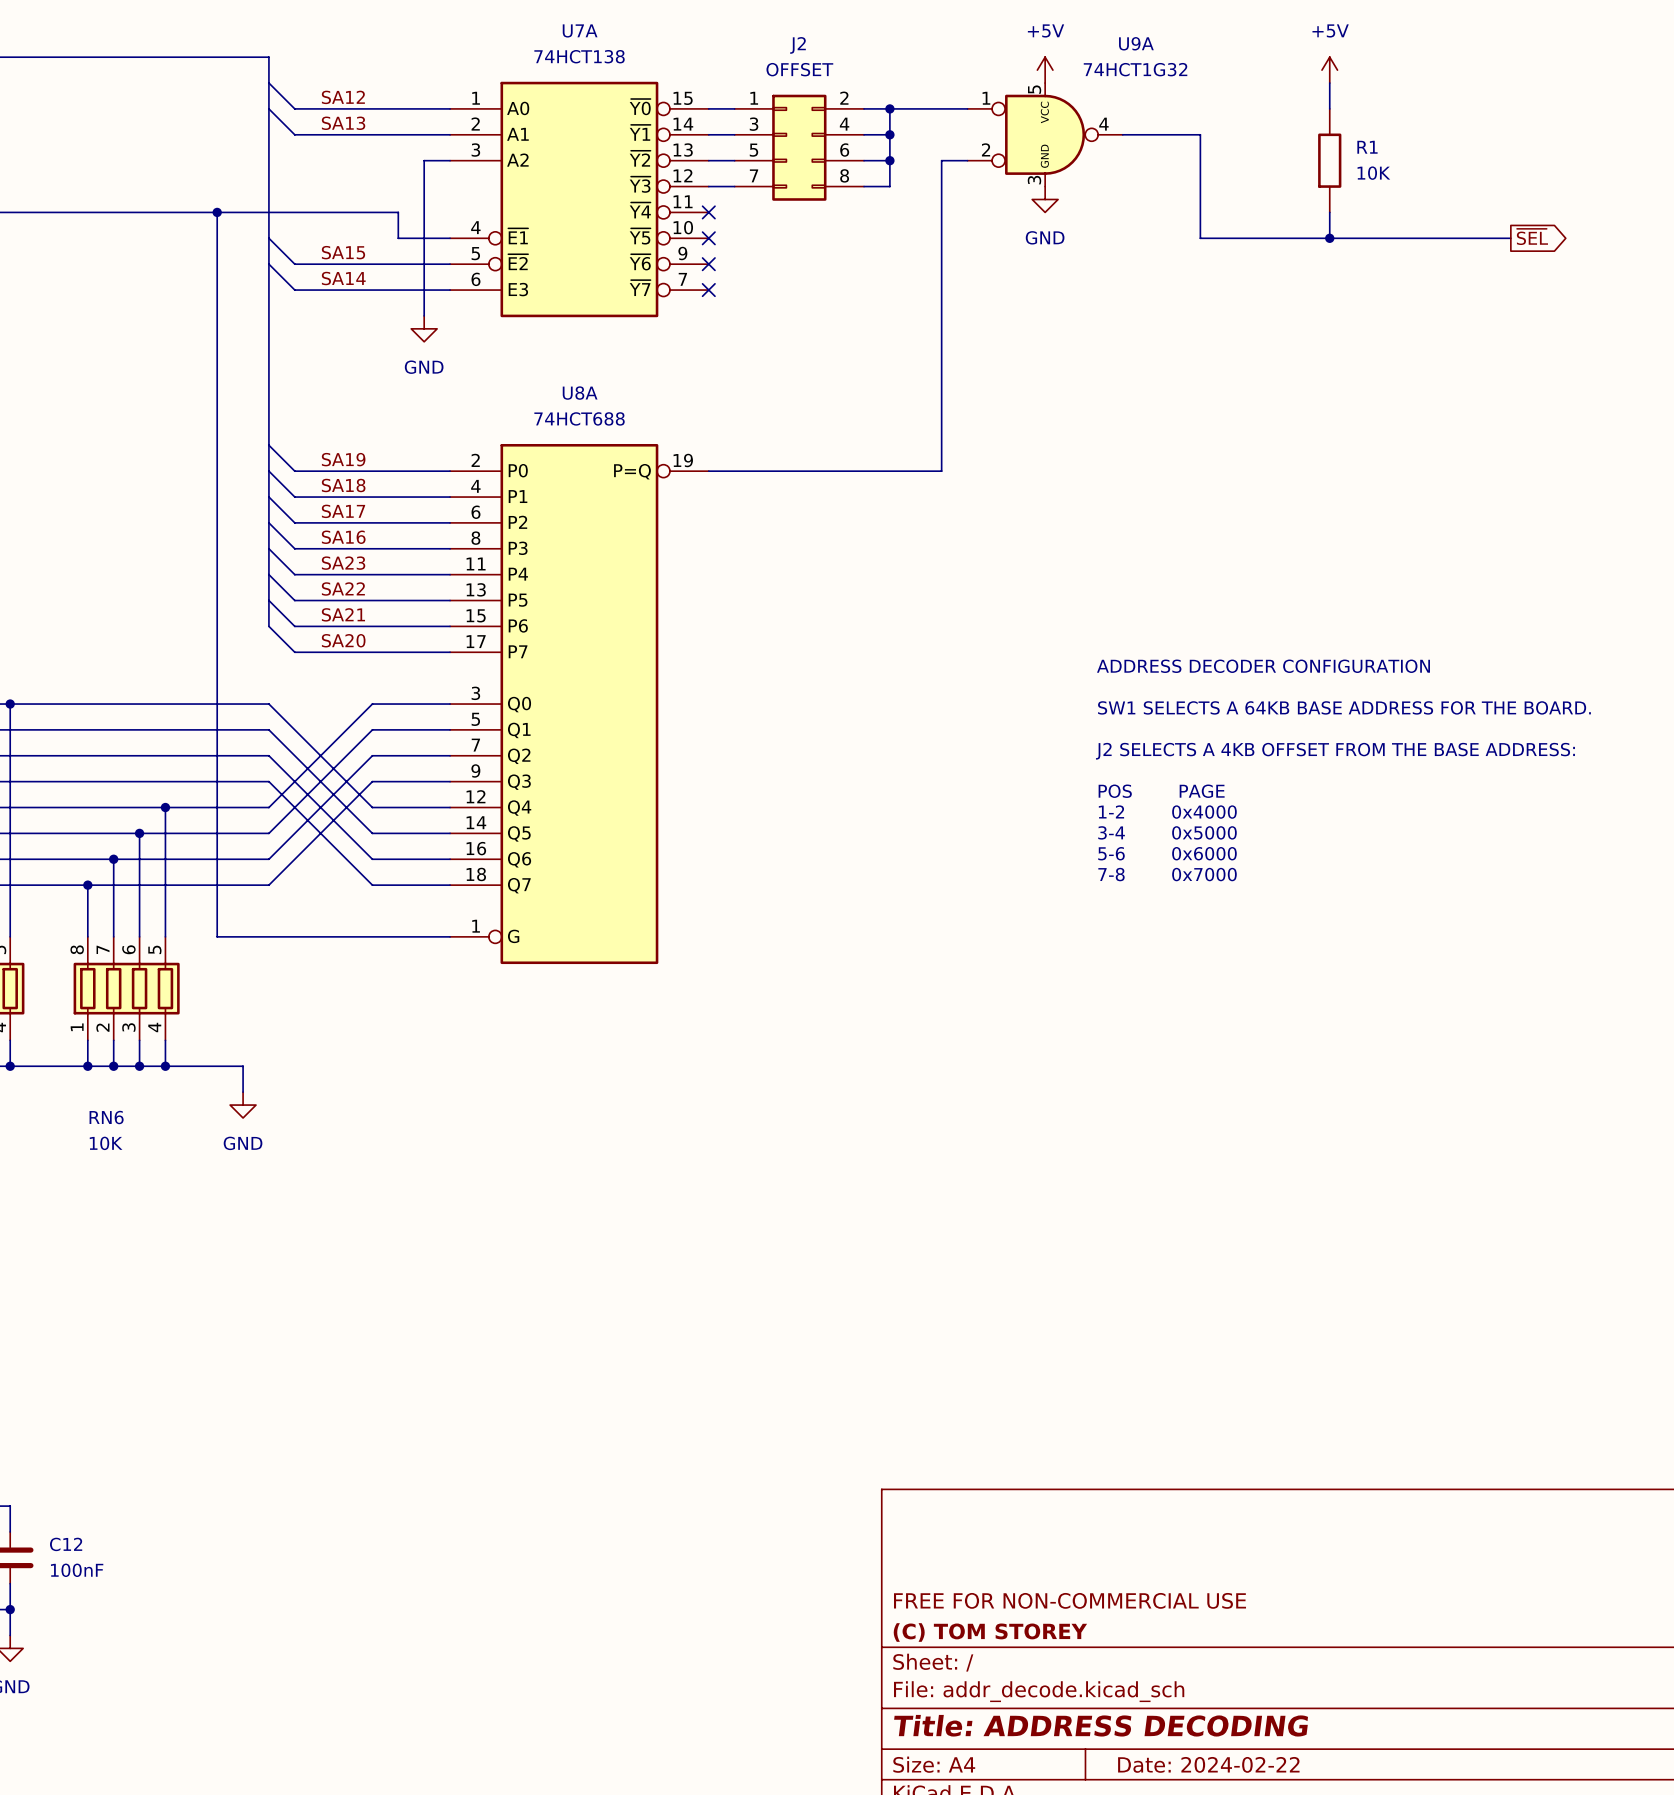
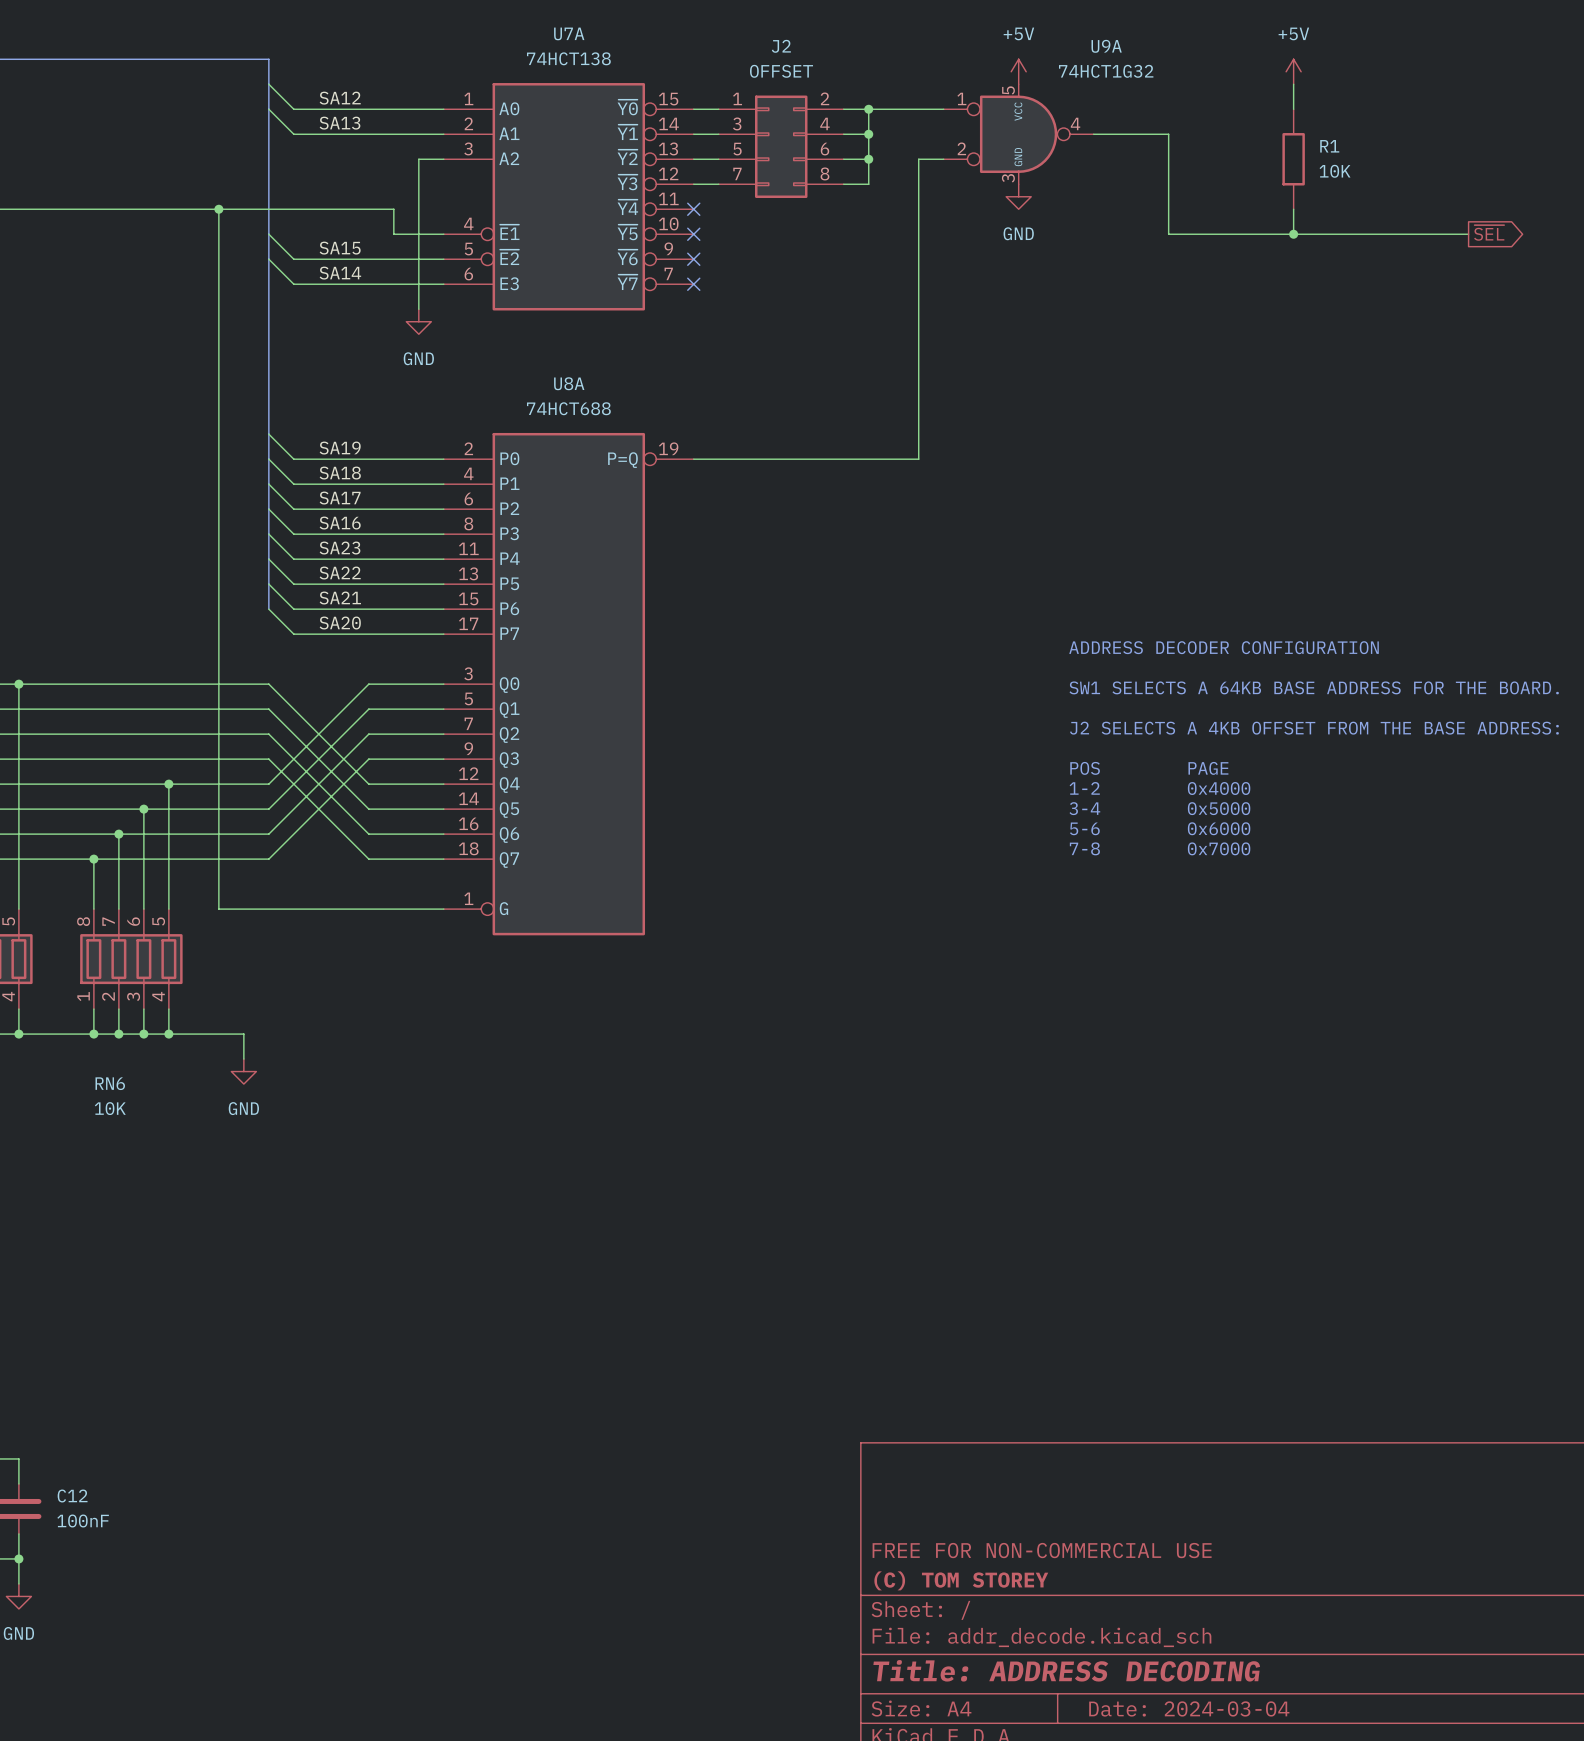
title block: Date: 2024-02-22 (1208, 1764) -> Date: 2024-03-04 (1189, 1708)

